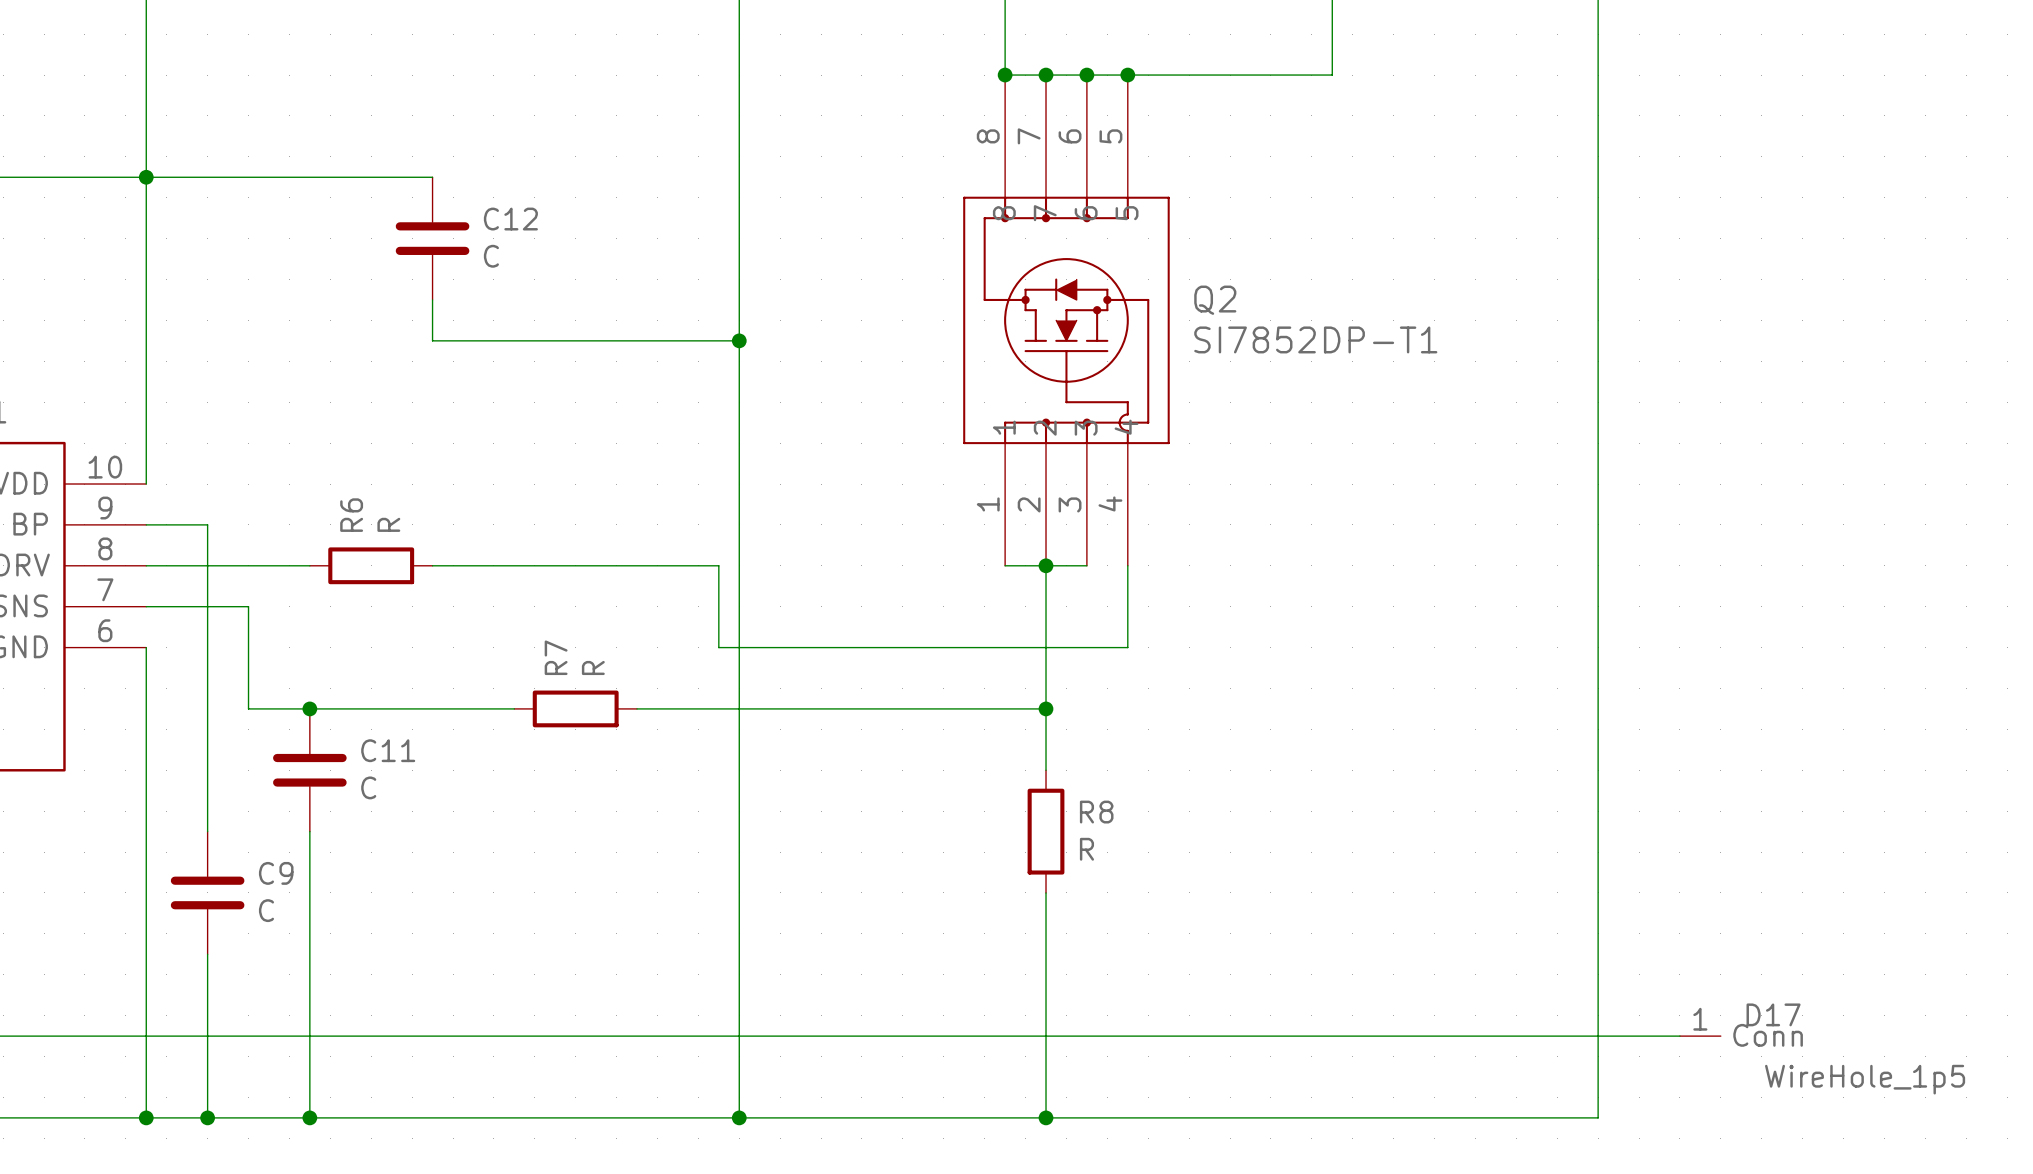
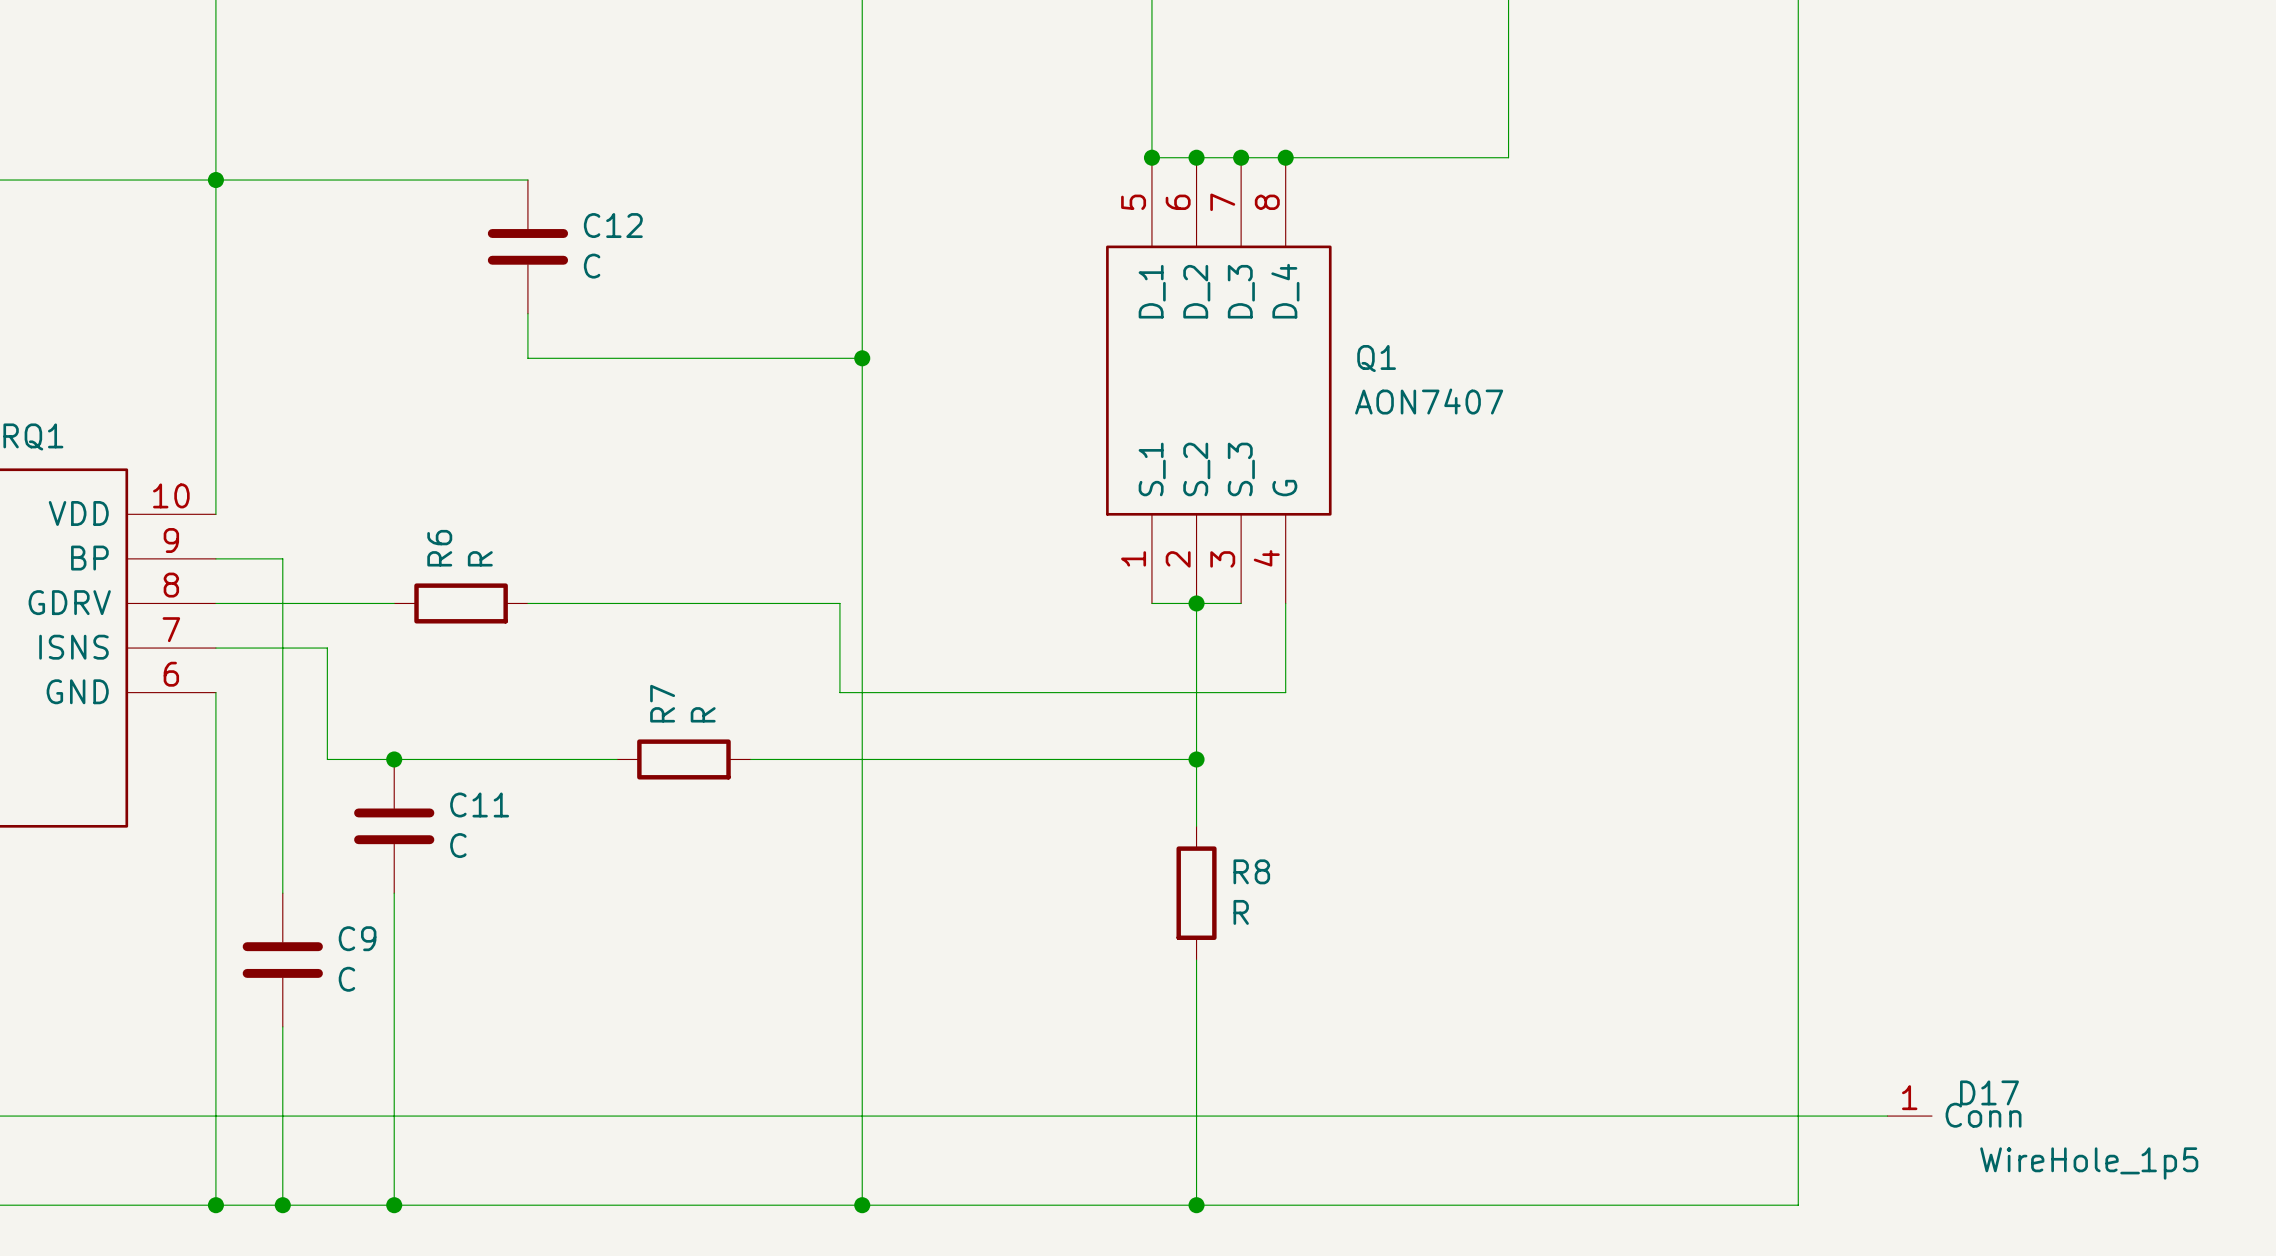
wire: (1005, 75) (1332, 75) -> (1151, 68) (1151, 157) (1508, 157) (1508, 68)
junction: (1005, 75) -> none
junction: (1046, 75) -> none
junction: (1086, 75) -> none
junction: (1127, 75) -> none
junction: none -> (1151, 157)
junction: none -> (1196, 157)
junction: none -> (1241, 157)
junction: none -> (1285, 157)
Q2: SI7852DP-T1 (1066, 320) -> none
Q1: none -> AON7407 (1218, 380)

